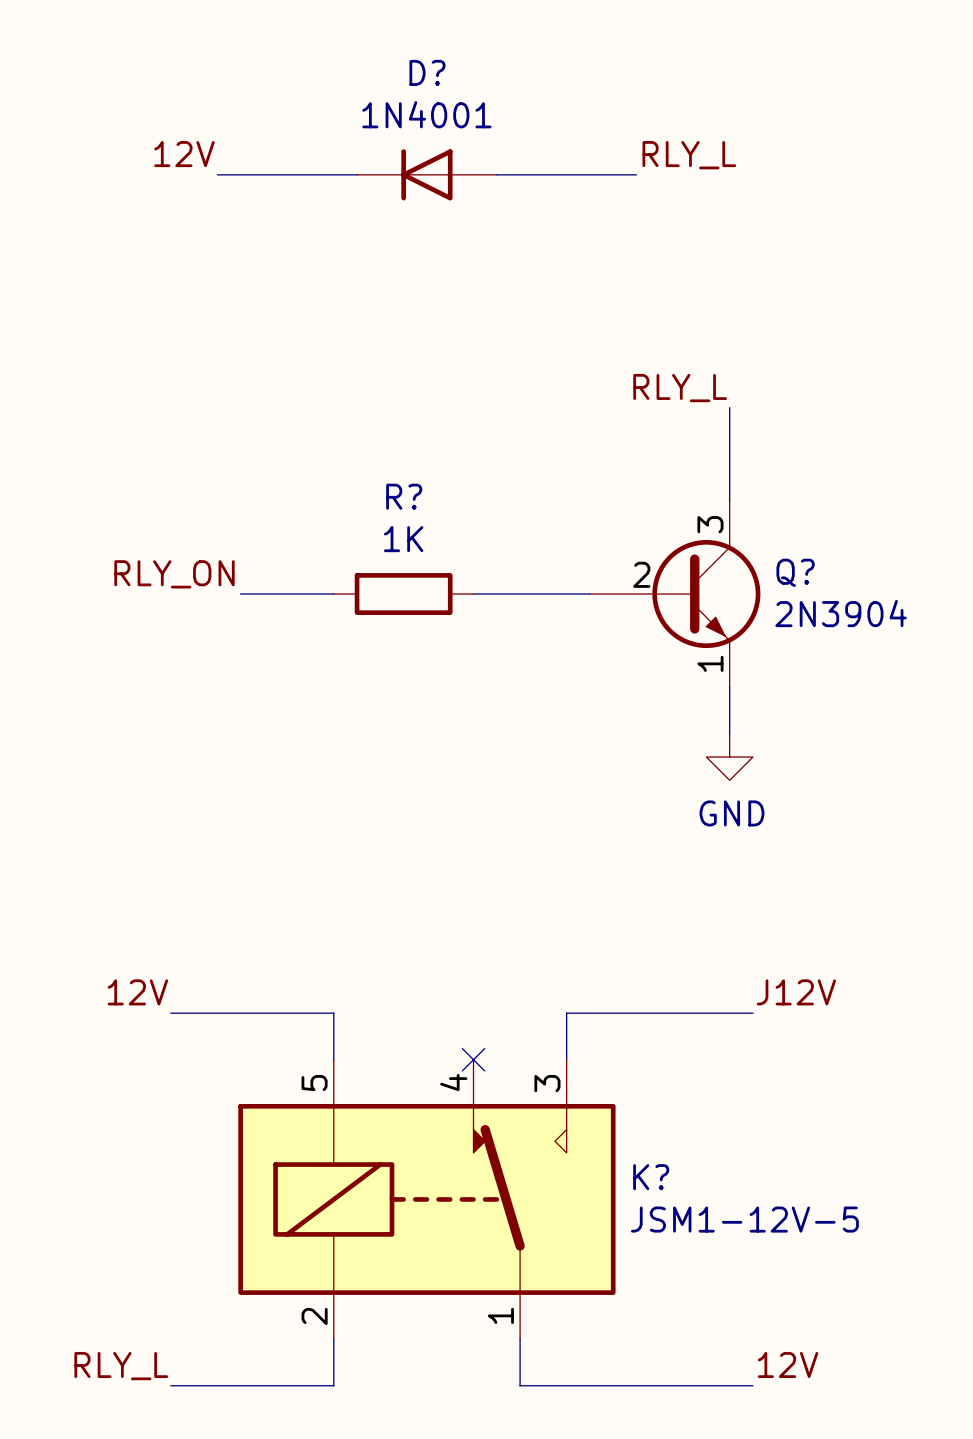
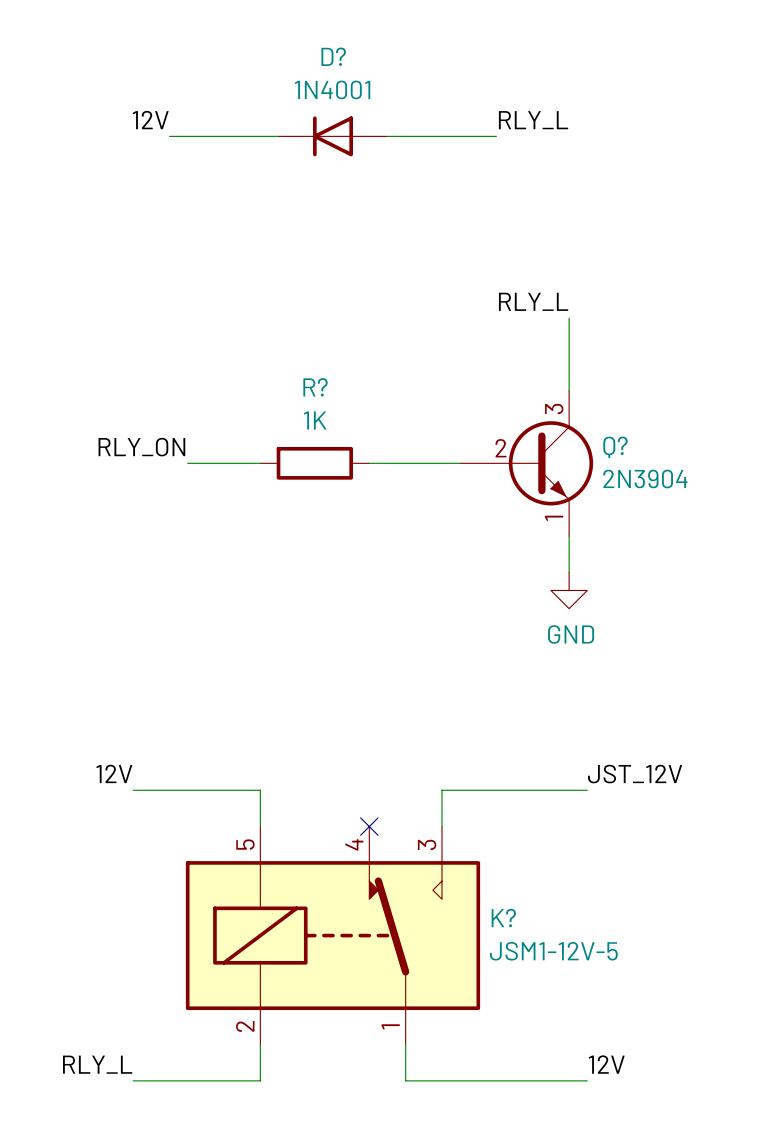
label: J12V (796, 992) -> JST_12V (635, 774)

